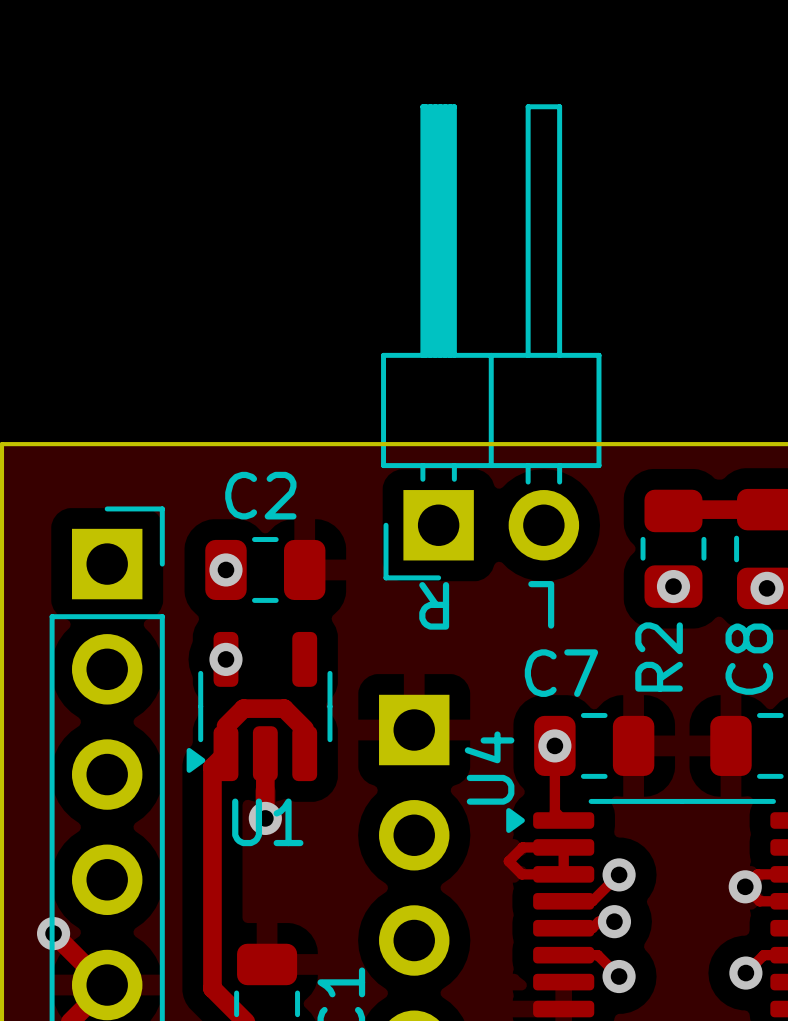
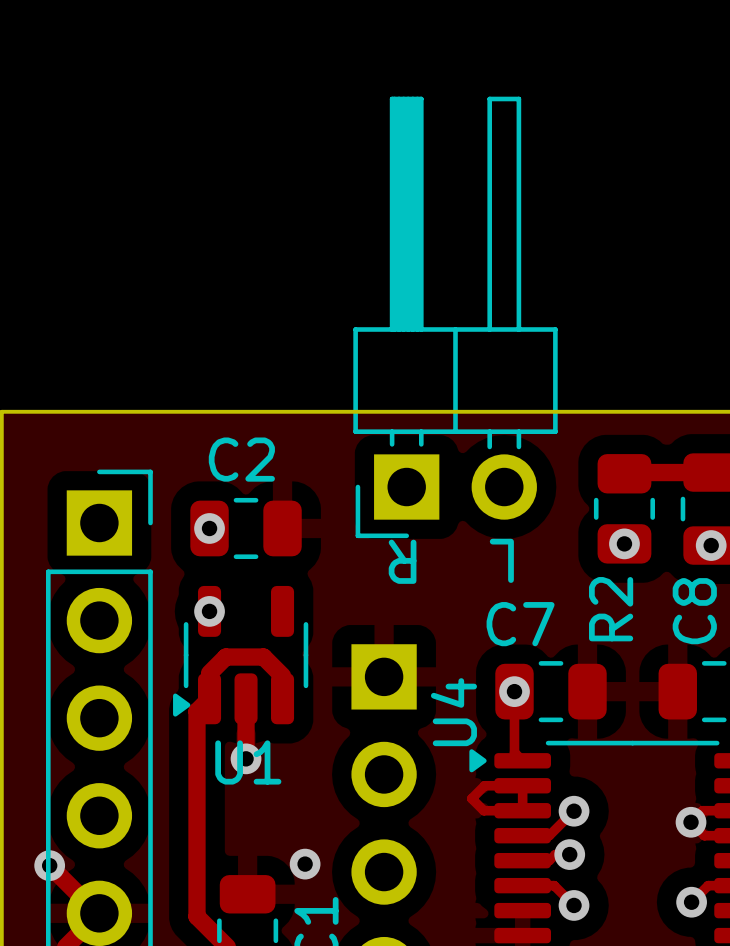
via: none -> (305, 864)

